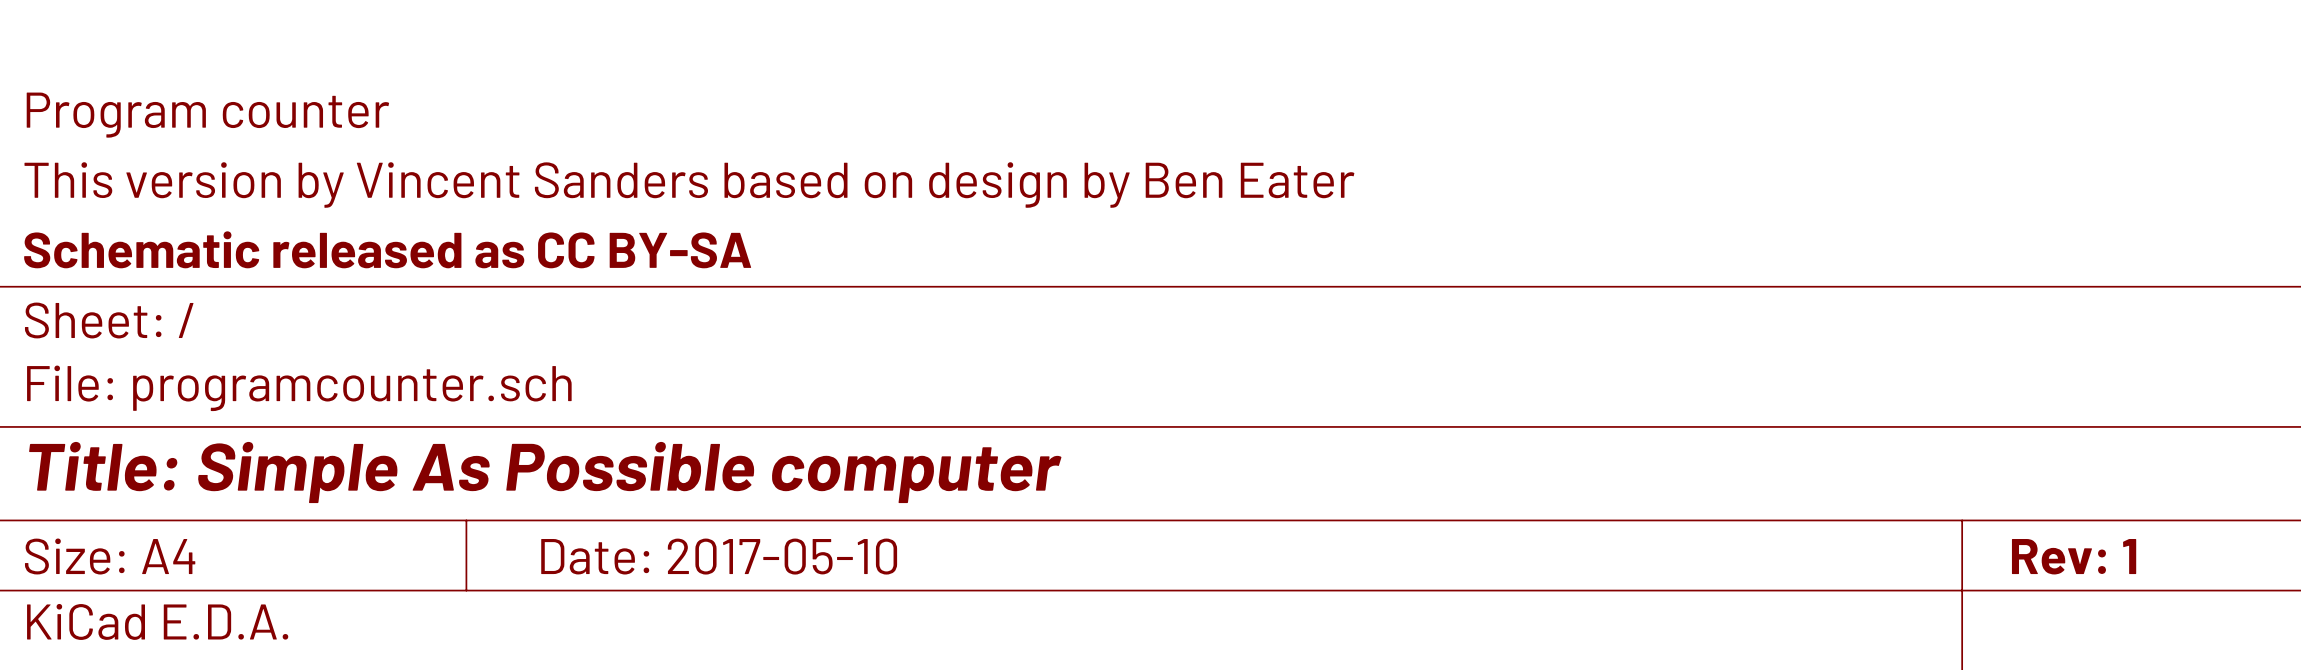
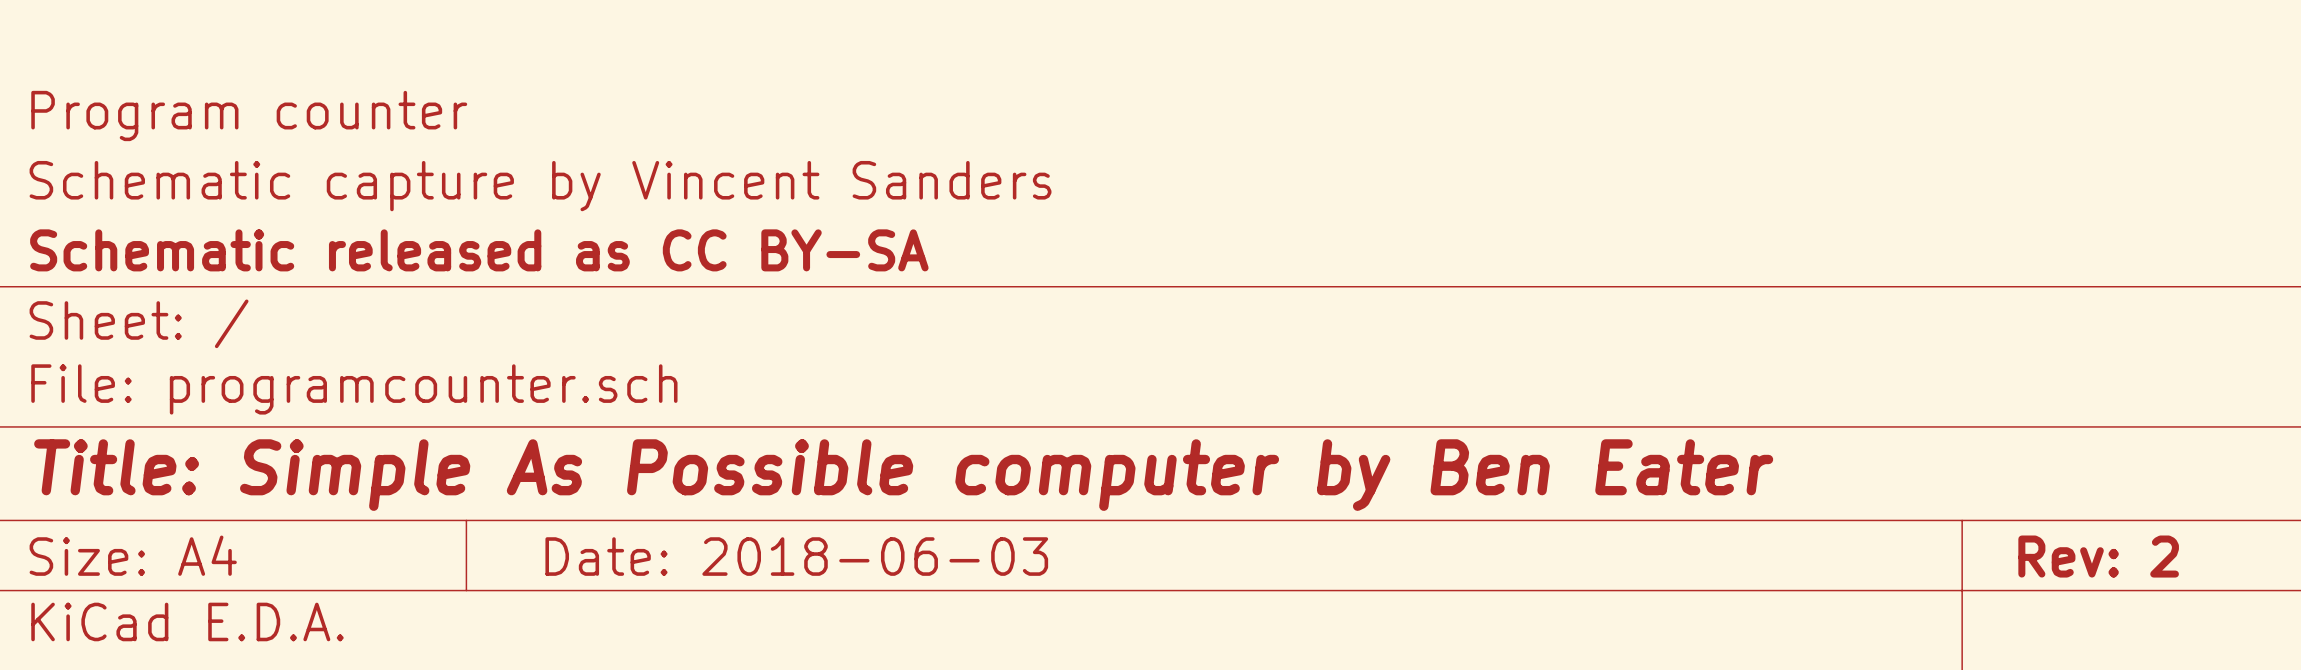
title block: This version by Vincent Sanders based on design by Ben Eater (689, 185) -> Schematic capture by Vincent Sanders (540, 186)
title block: Title: Simple As Possible computer (545, 472) -> Title: Simple As Possible computer by Ben Eater (903, 475)
title block: Date: 2017-05-10 (719, 556) -> Date: 2018-06-03 (796, 556)
title block: Rev: 1 (2074, 556) -> Rev: 2 (2098, 556)

